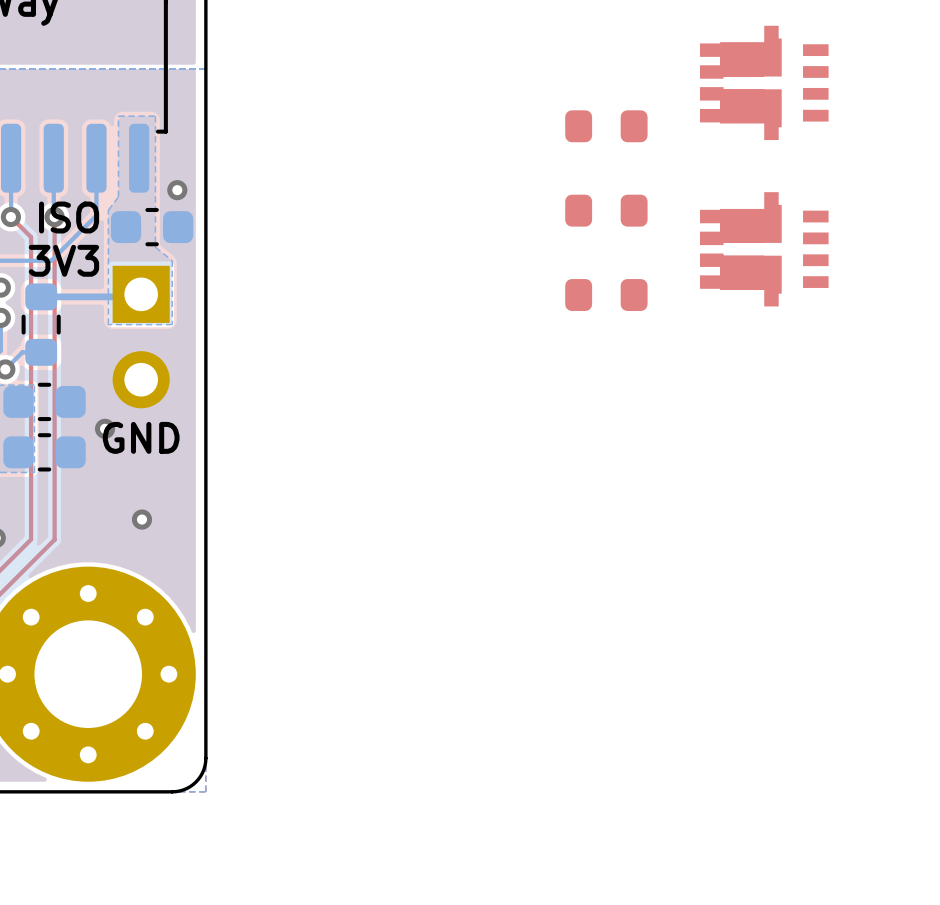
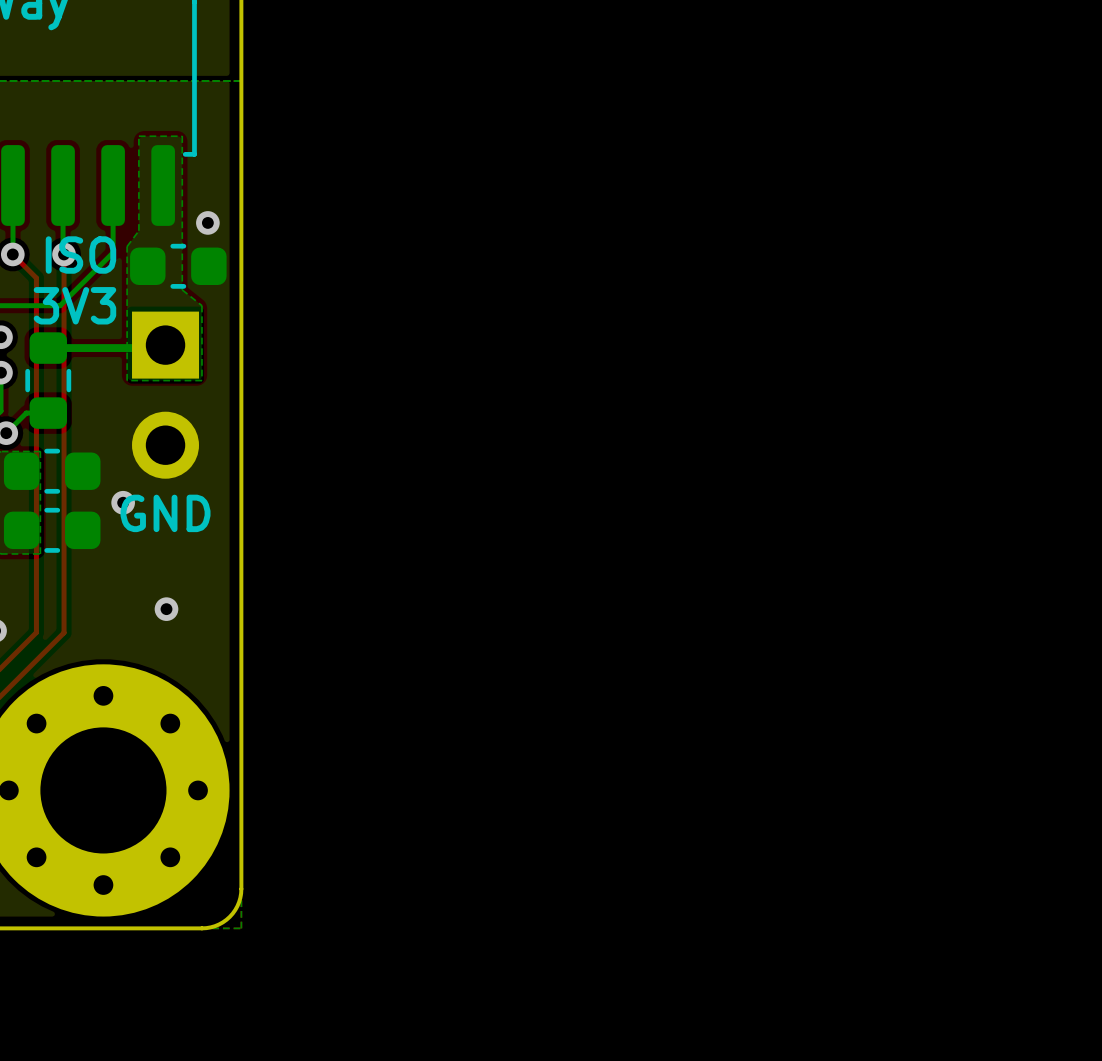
part: (764, 82) -> none
part: (606, 126) -> none
part: (606, 210) -> none
part: (764, 249) -> none
part: (606, 295) -> none

